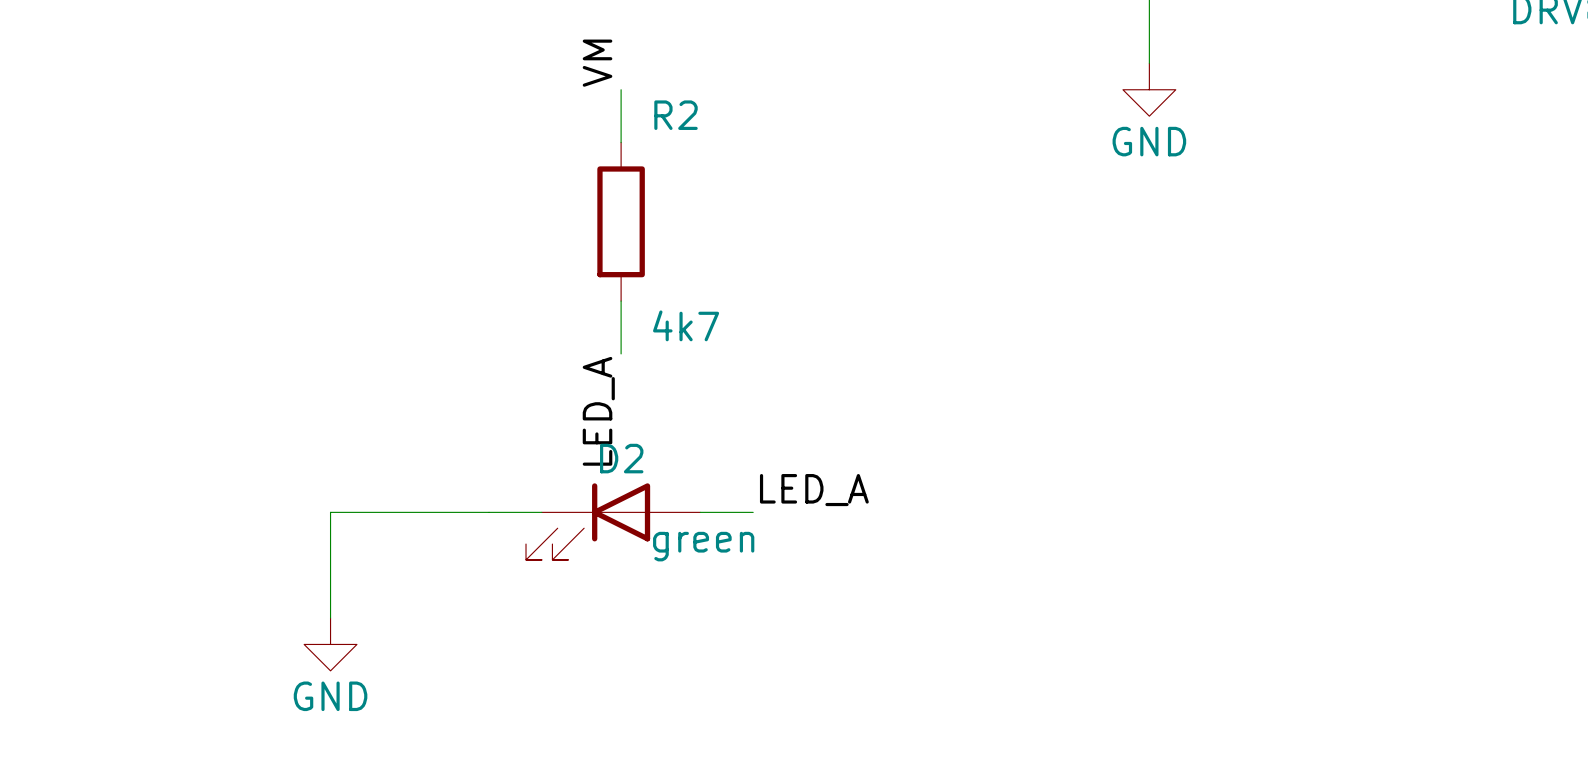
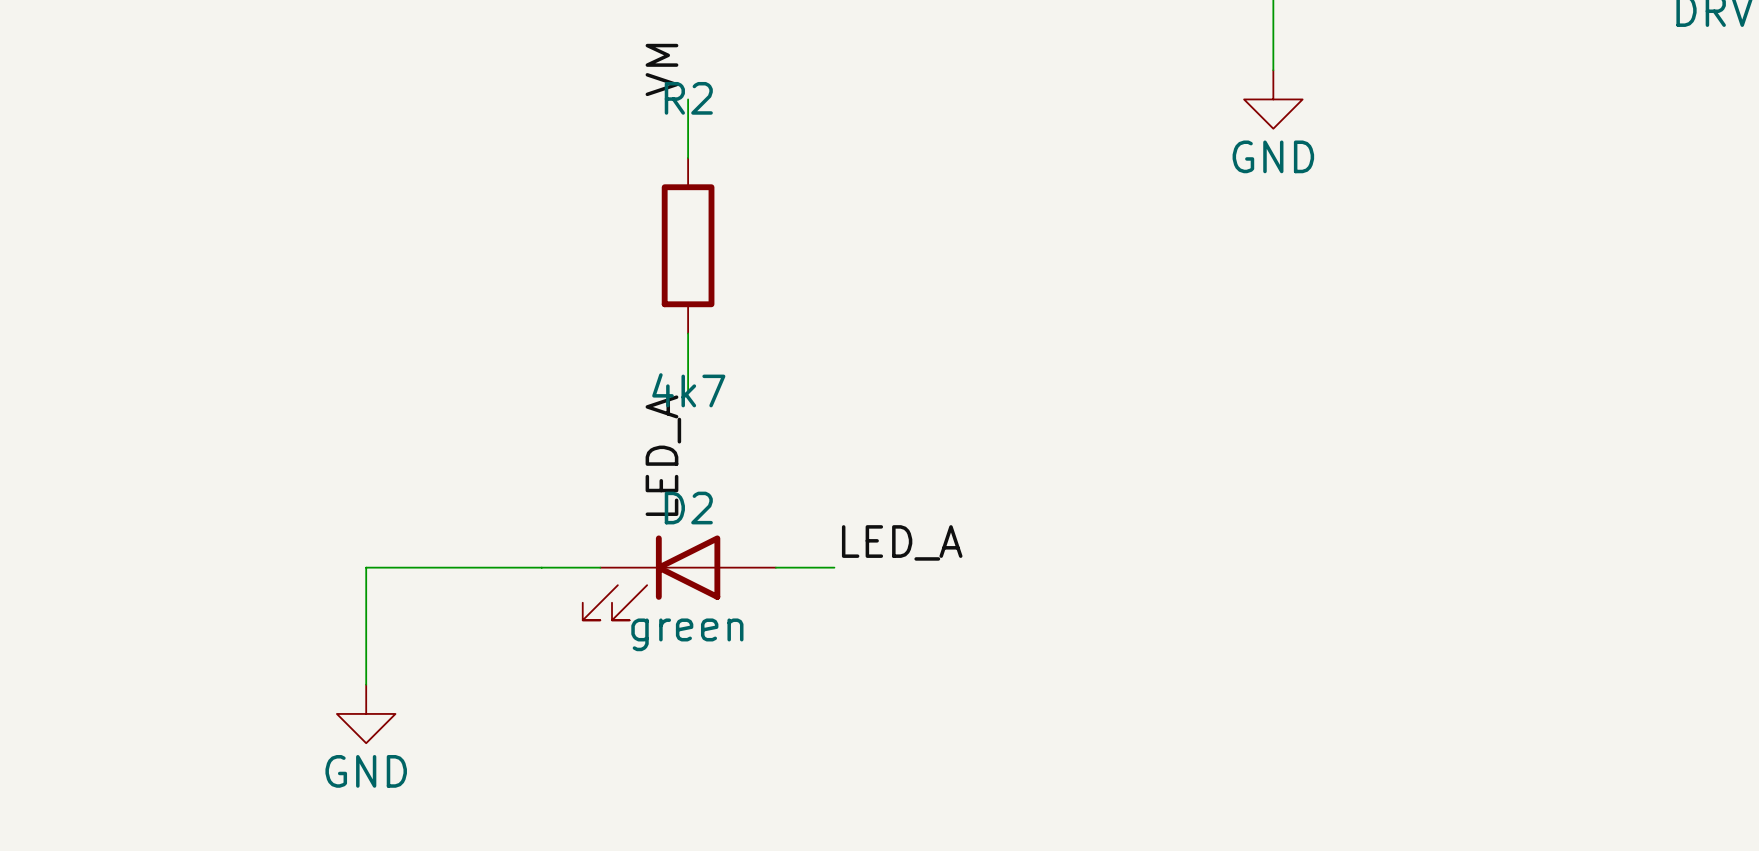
R2 name position: R2 (676, 115) -> R2 (688, 98)
R2 value position: 4k7 (686, 325) -> 4k7 (688, 390)
D2 value position: green (703, 546) -> green (687, 634)

